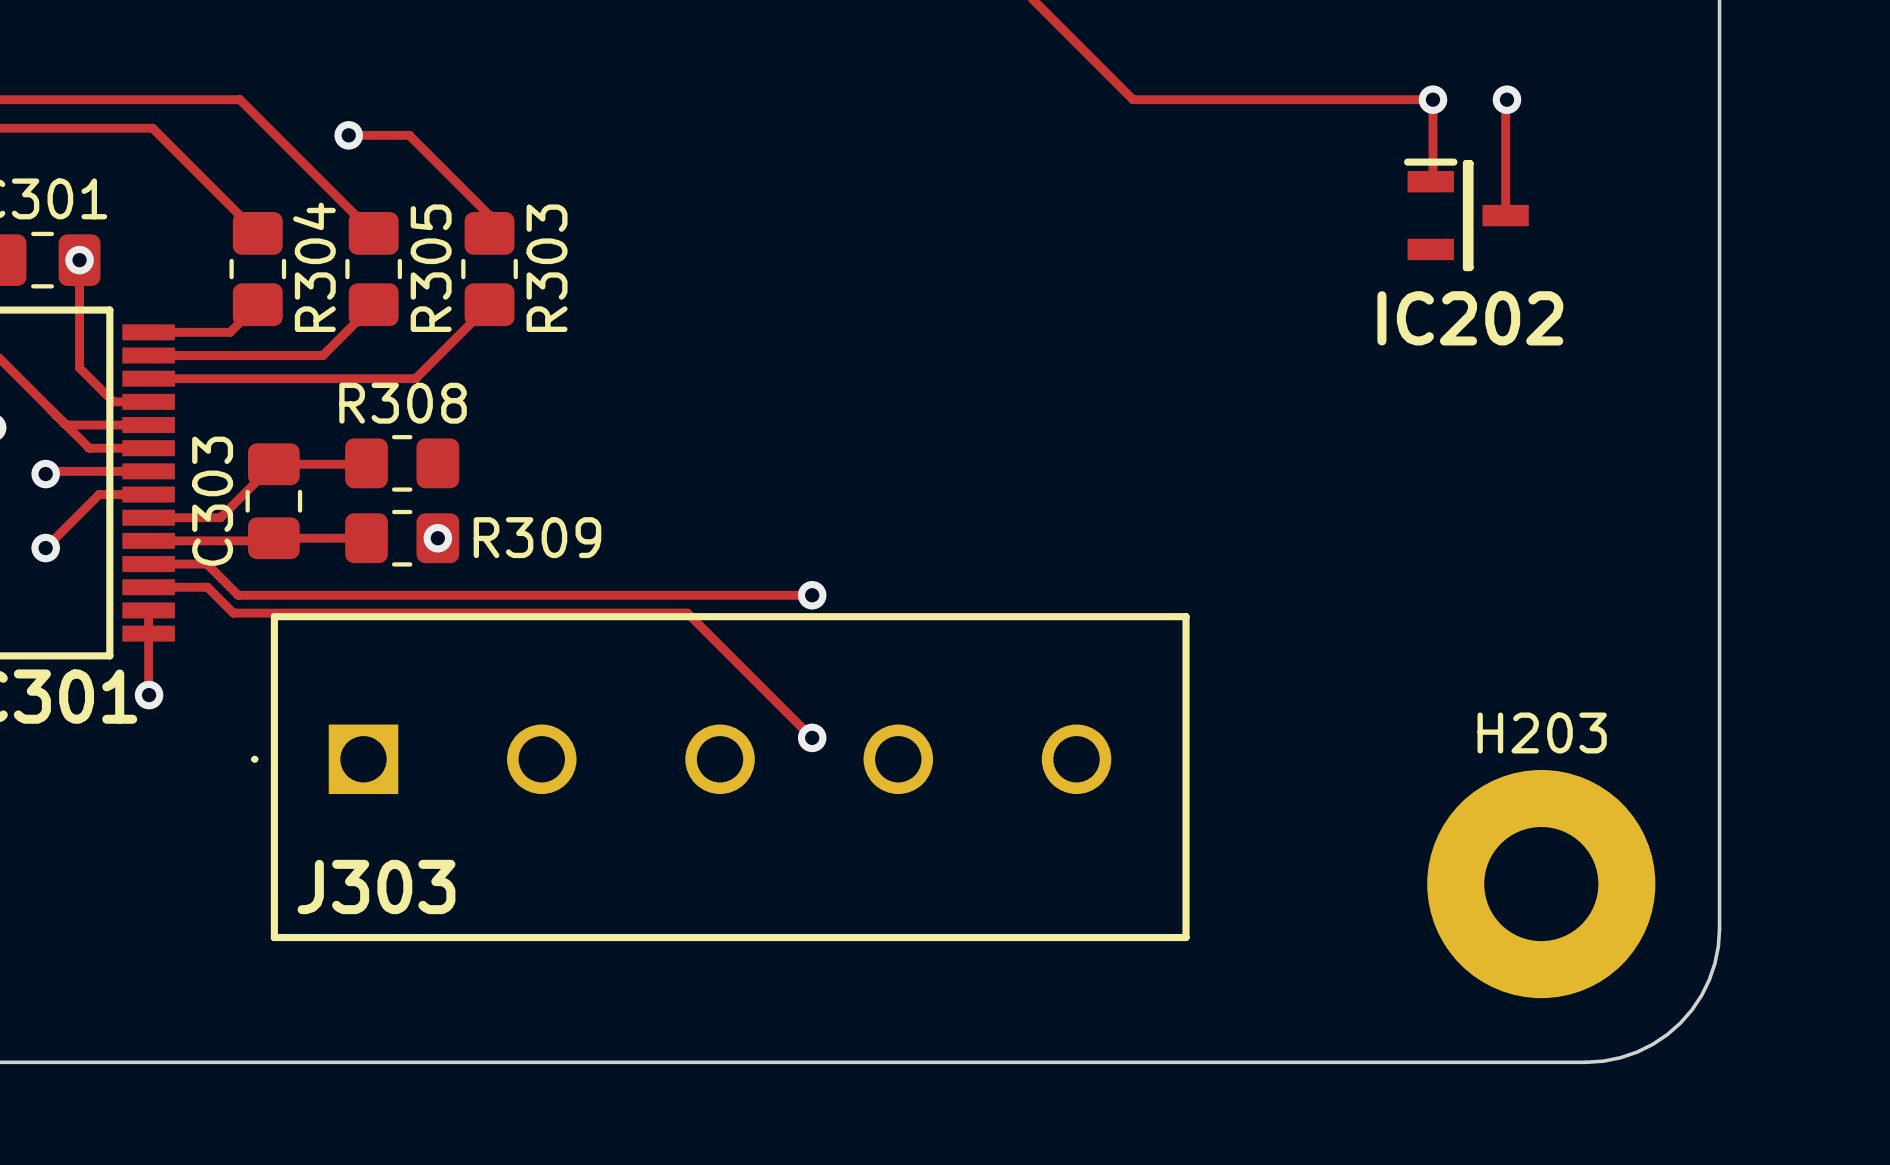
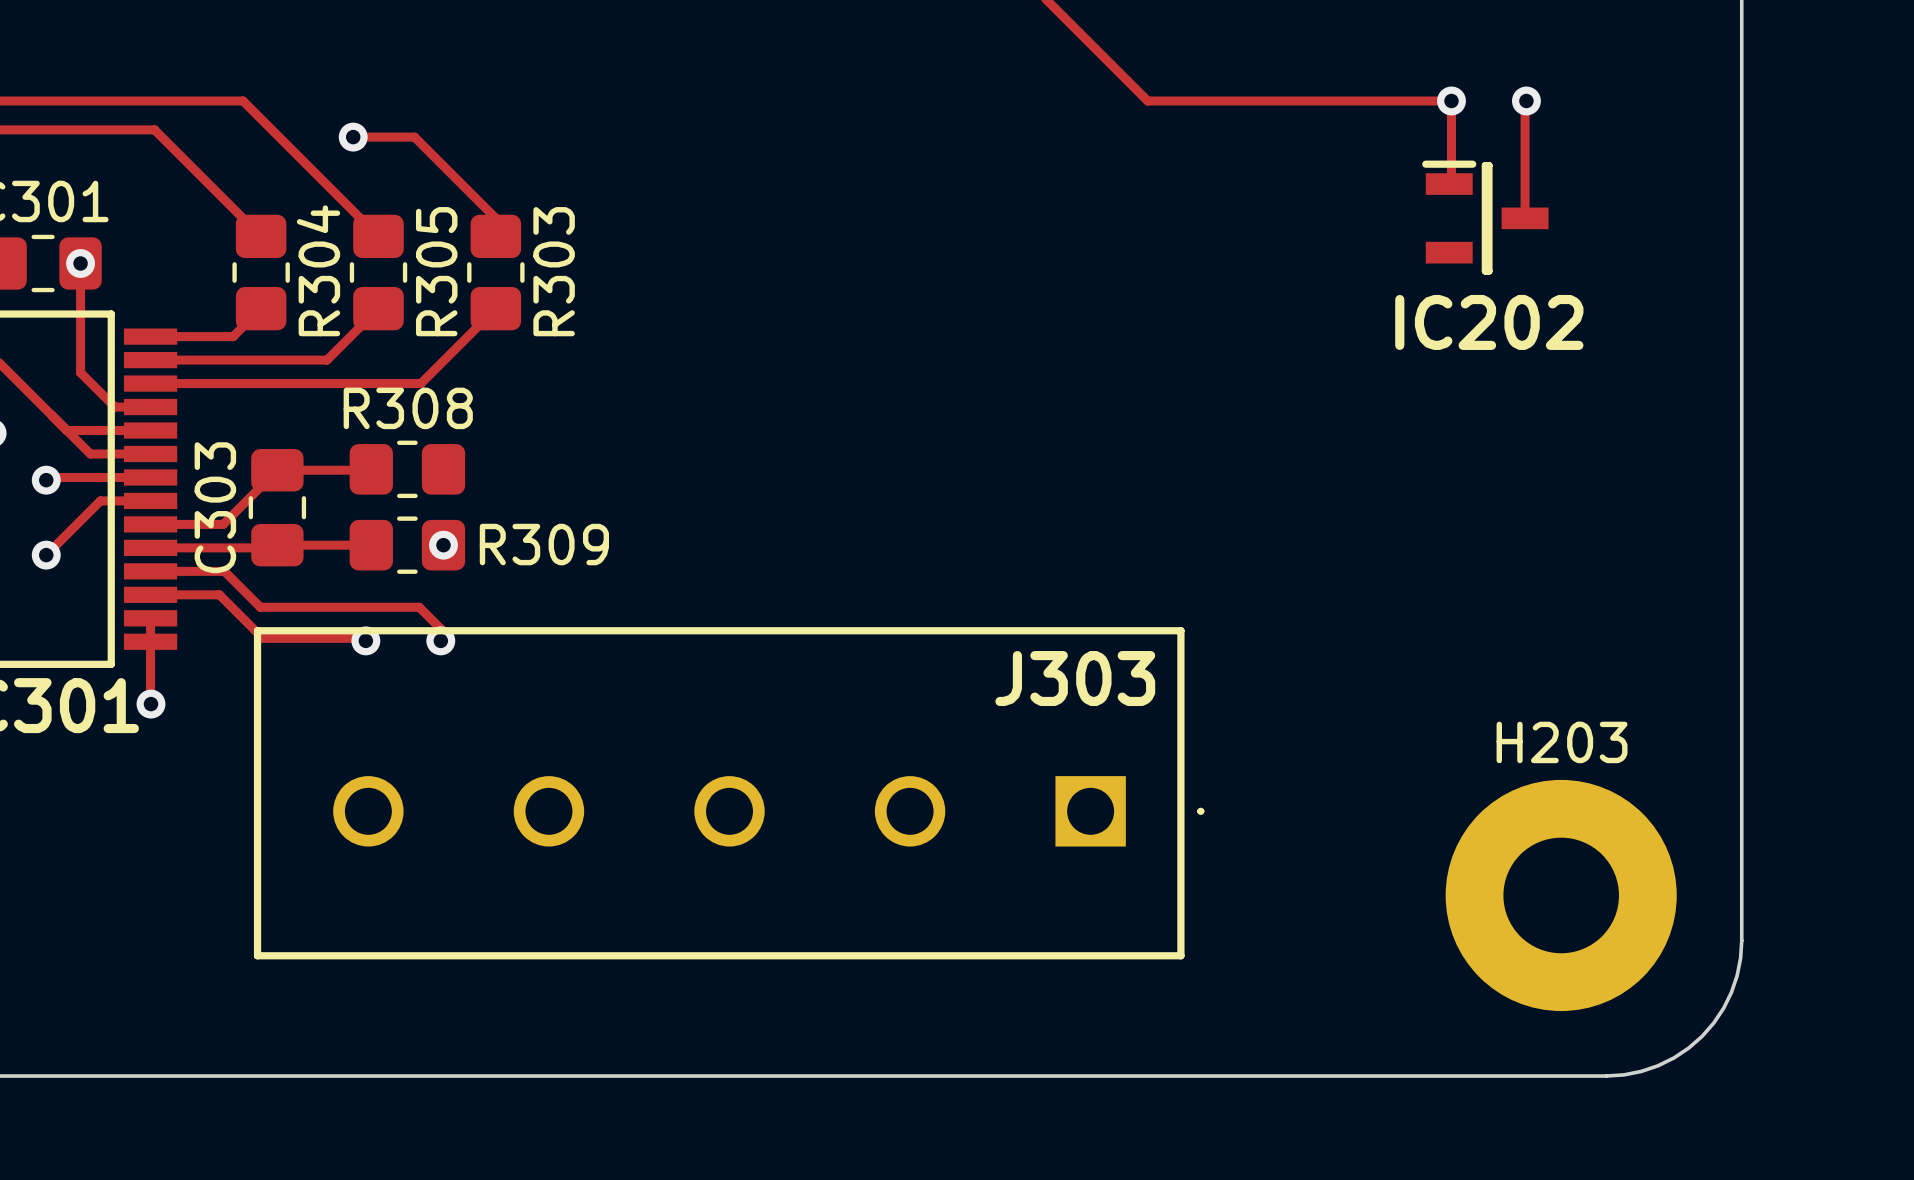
track: (207, 564) (238, 595) (812, 595) -> (209, 571) (224, 571) (260, 607) (419, 607) (440, 628) (440, 640)
track: (207, 587) (233, 613) (687, 613) (812, 737) -> (210, 594) (219, 594) (262, 638) (364, 638) (365, 640)
via: (812, 595) -> none
via: none -> (365, 640)
via: none -> (440, 640)
via: (812, 737) -> none
J303 rotation: 0° (720, 777) -> 180° (729, 793)

